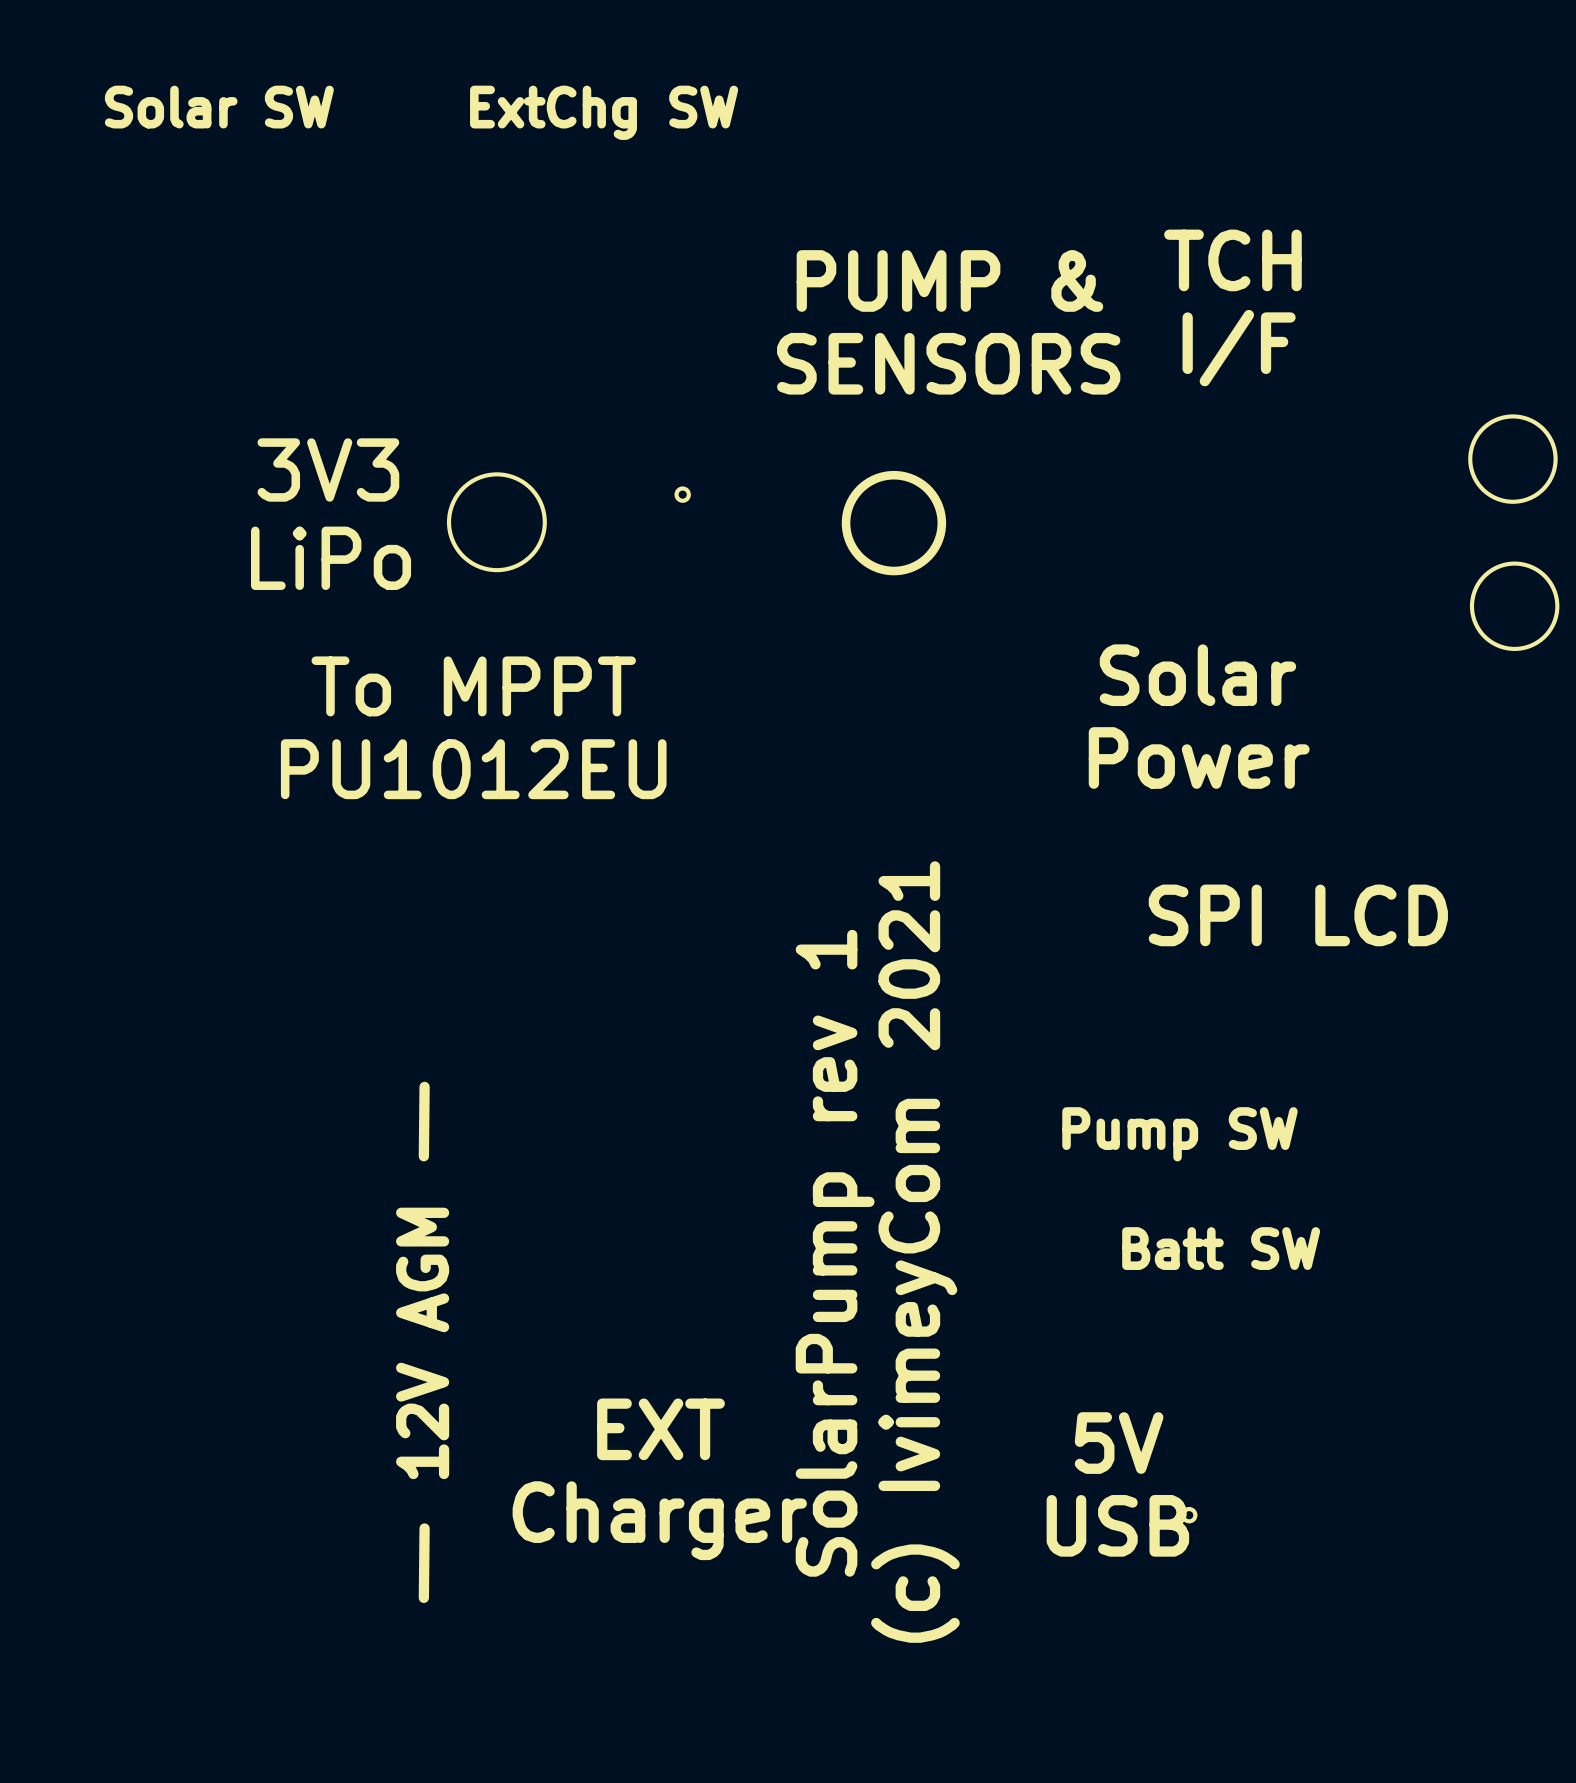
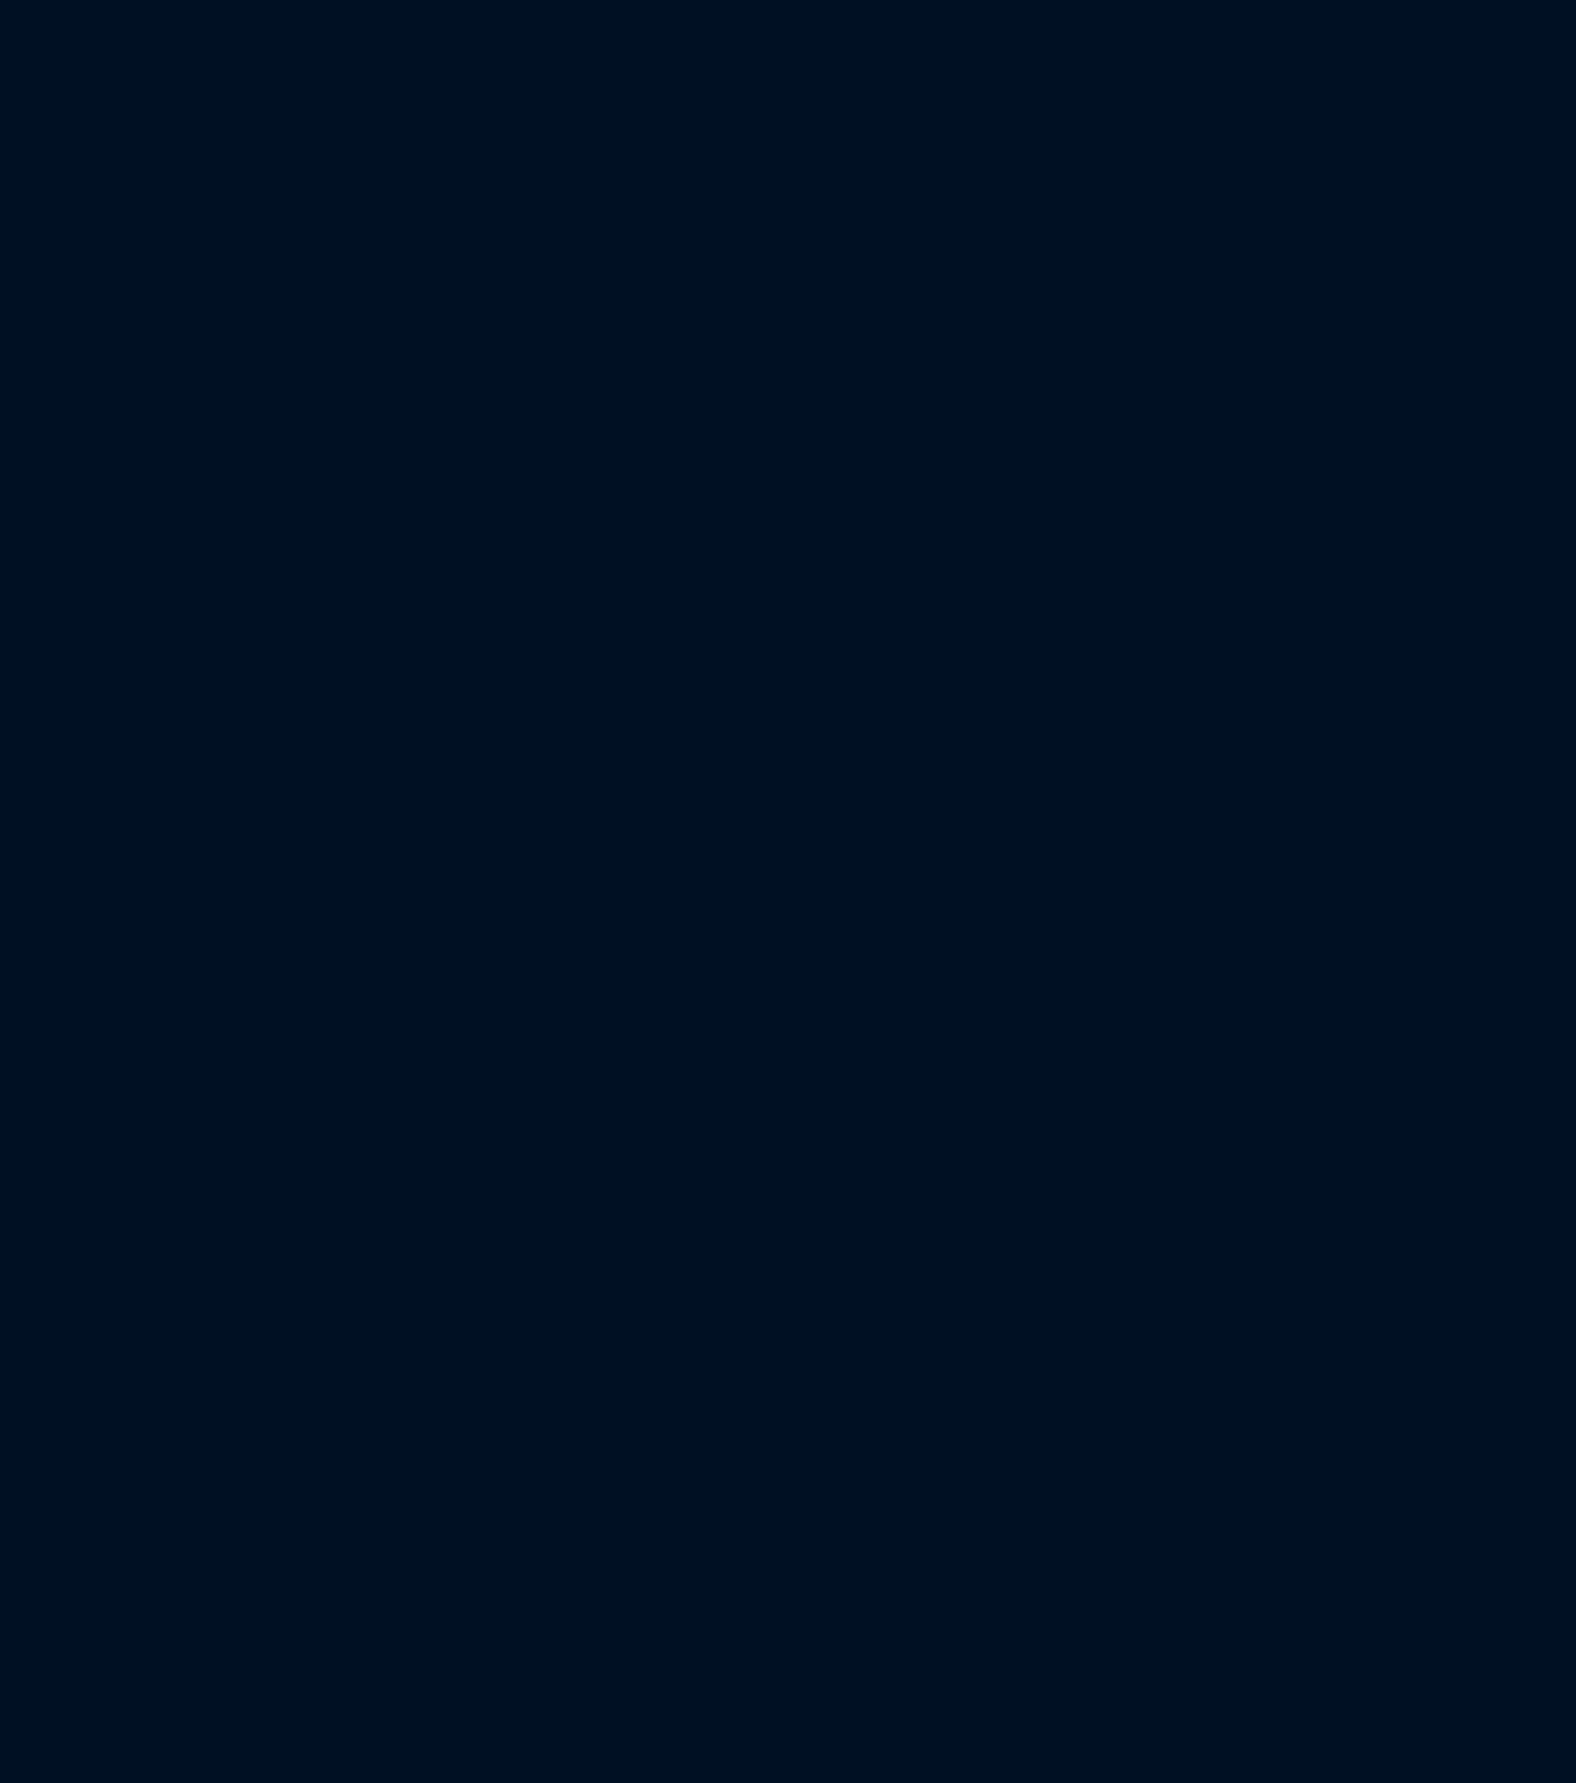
text: Solar SW (219, 107) -> none
text: ExtChg SW (604, 112) -> none
text: TCH (1232, 260) -> none
text: PUMP & (949, 280) -> none
text: I/F (1239, 348) -> none
text: SENSORS (948, 363) -> none
drawing: [1468, 414, 1558, 504] -> none
text: 3V3 (328, 469) -> none
drawing: [841, 470, 947, 576] -> none
drawing: [446, 472, 547, 573] -> none
drawing: [674, 486, 691, 503] -> none
text: LiPo (331, 558) -> none
drawing: [1469, 561, 1560, 651] -> none
text: Solar (1197, 675) -> none
text: To MPPT (473, 686) -> none
text: Power (1199, 757) -> none
text: PU1012EU (473, 769) -> none
text: SPI LCD (1298, 915) -> none
line: (424, 1086) (423, 1156) -> none
text: Pump SW (1180, 1134) -> none
text: Batt SW (1221, 1248) -> none
text: (c) IvimeyCom 2021 (915, 1252) -> none
text: SolarPump rev 1 (835, 1253) -> none
text: 12V AGM (422, 1343) -> none
text: EXT (660, 1429) -> none
text: 5V (1119, 1443) -> none
drawing: [1181, 1506, 1198, 1524] -> none
text: Charger (659, 1520) -> none
text: USB (1117, 1525) -> none
line: (424, 1528) (423, 1597) -> none

